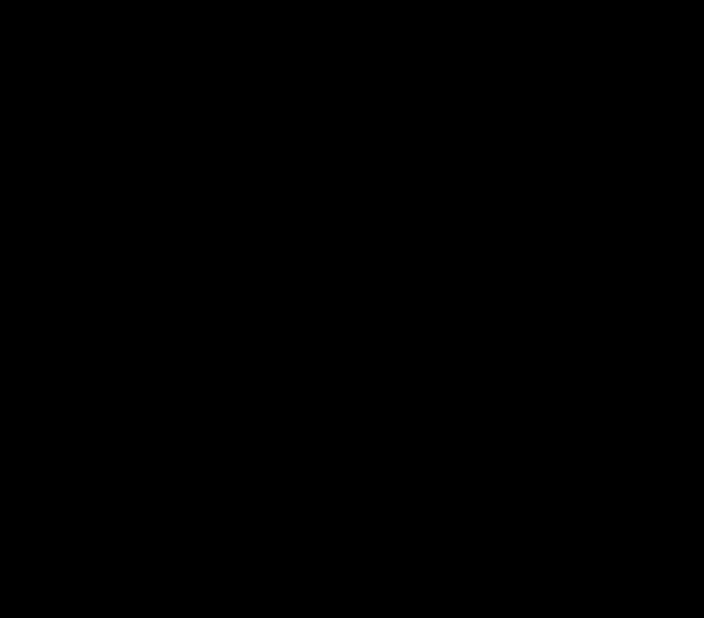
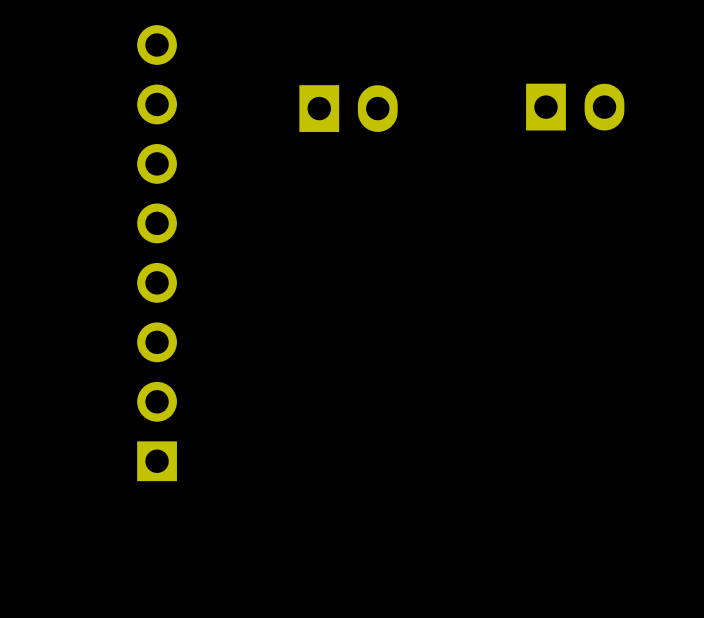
part: none -> (575, 107)
part: none -> (348, 108)
part: none -> (157, 253)

